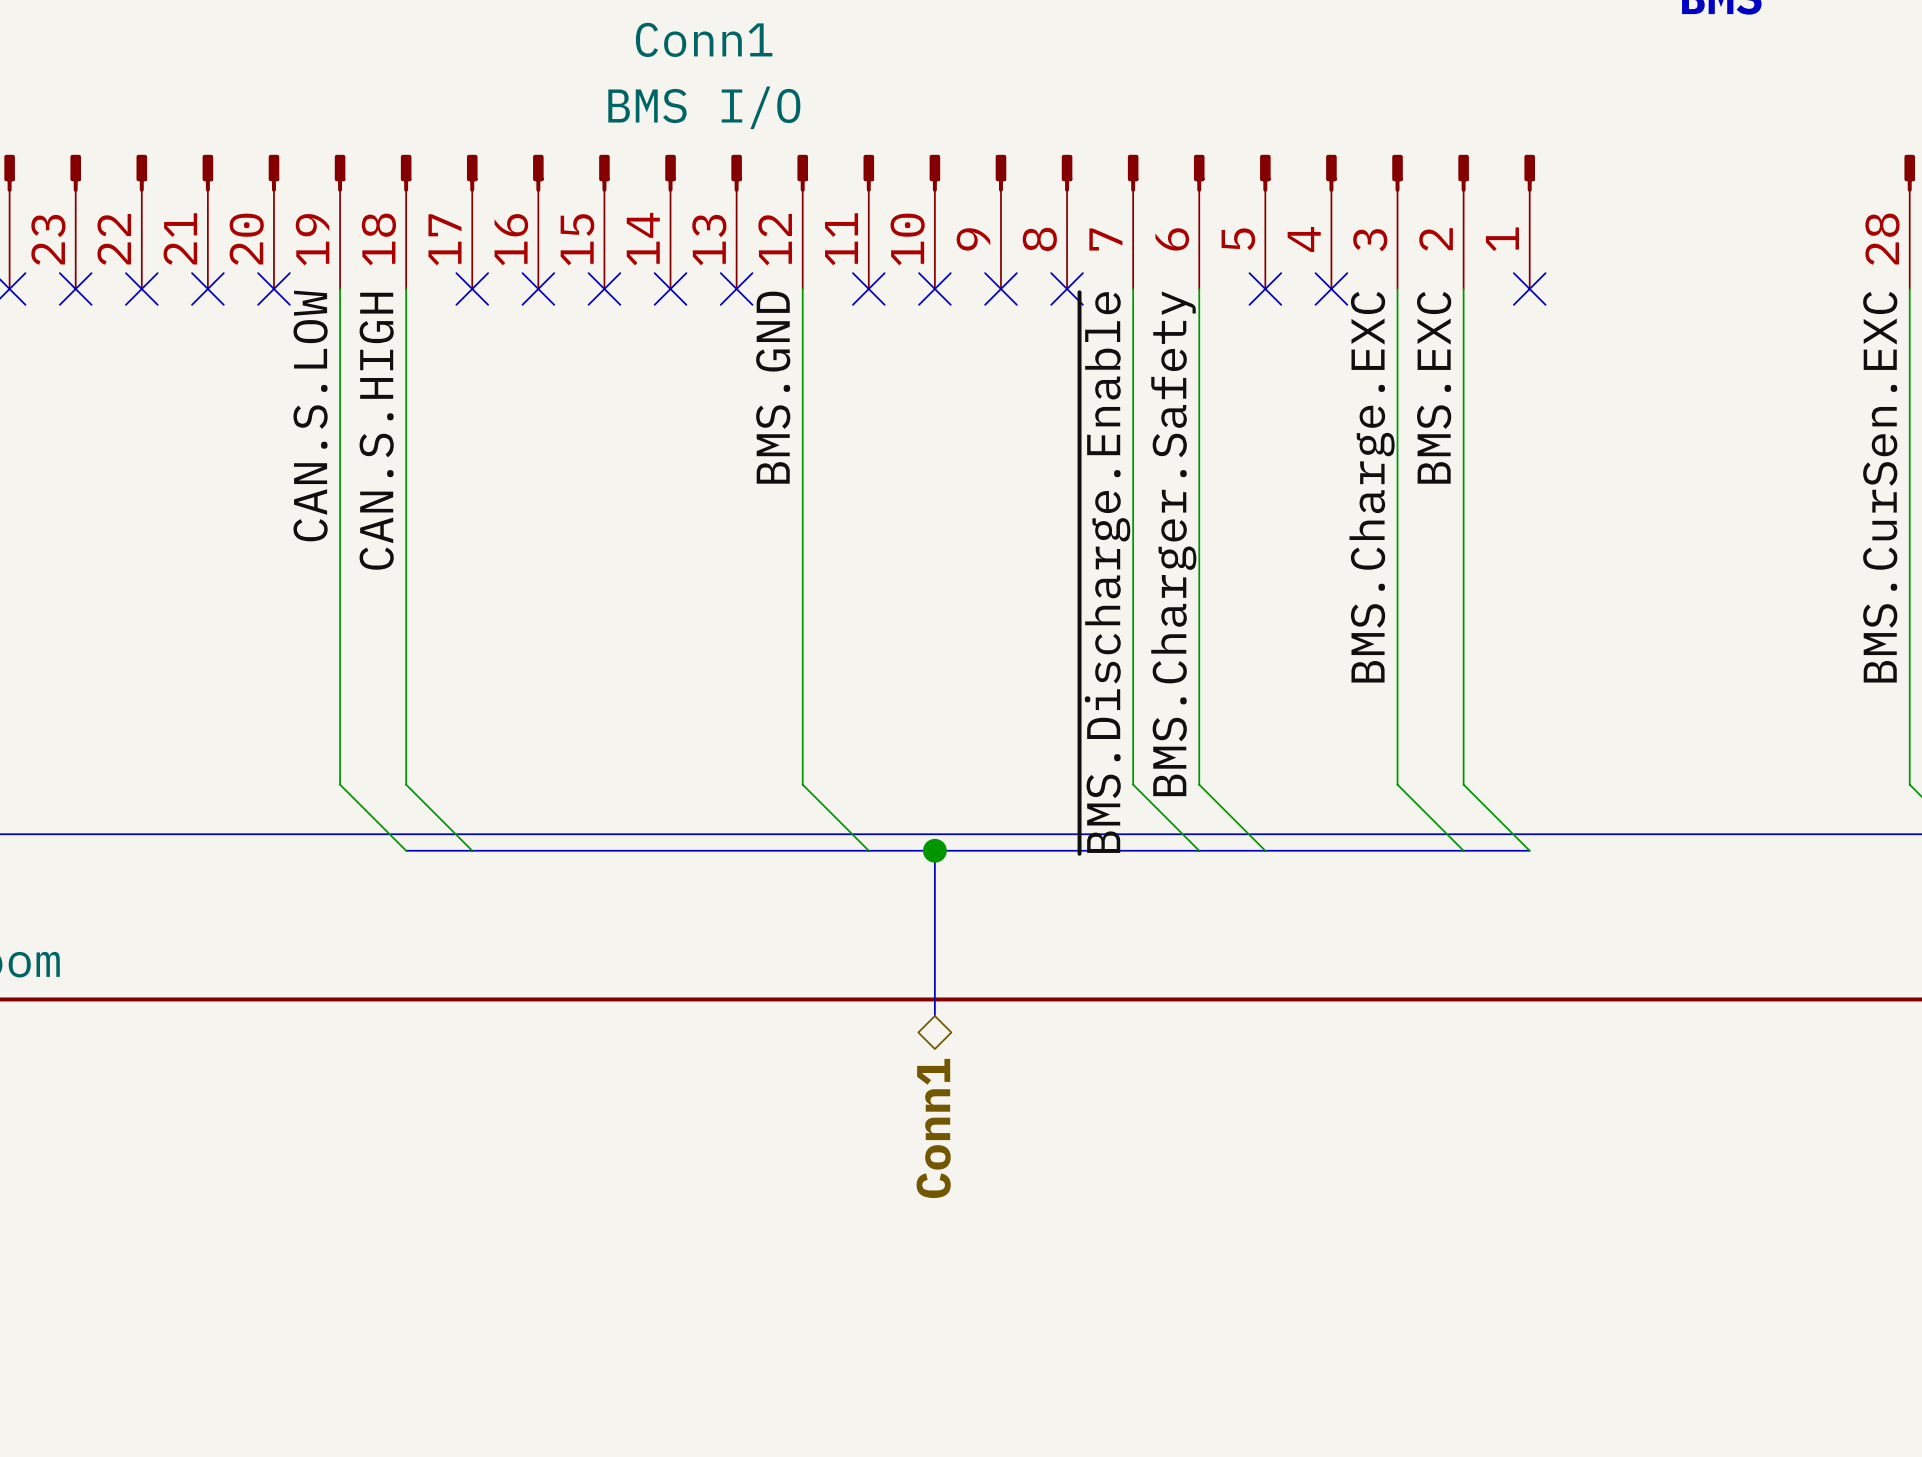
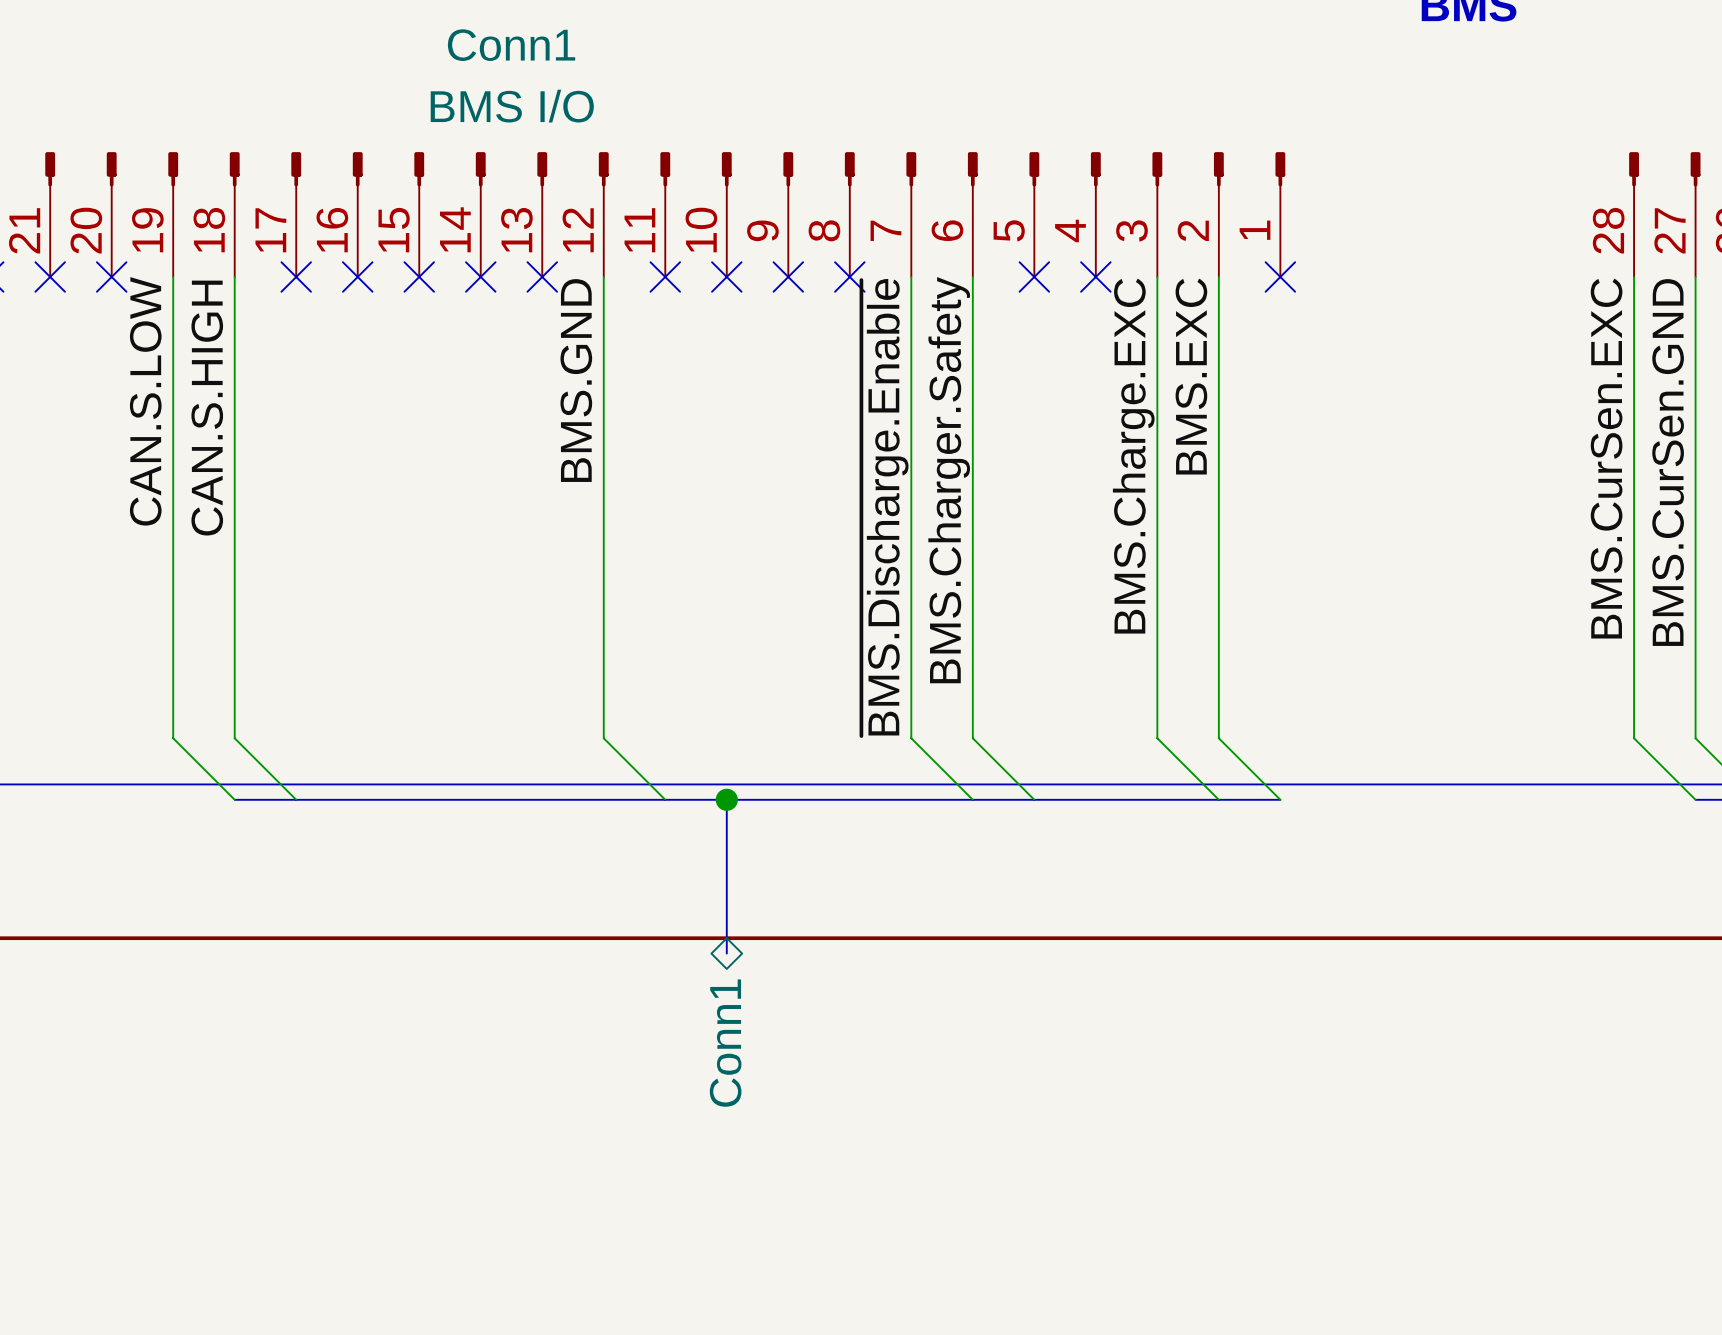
sheet pin: none -> Conn1 (725, 1043)
hierarchical label: Conn1 (933, 1128) -> none

